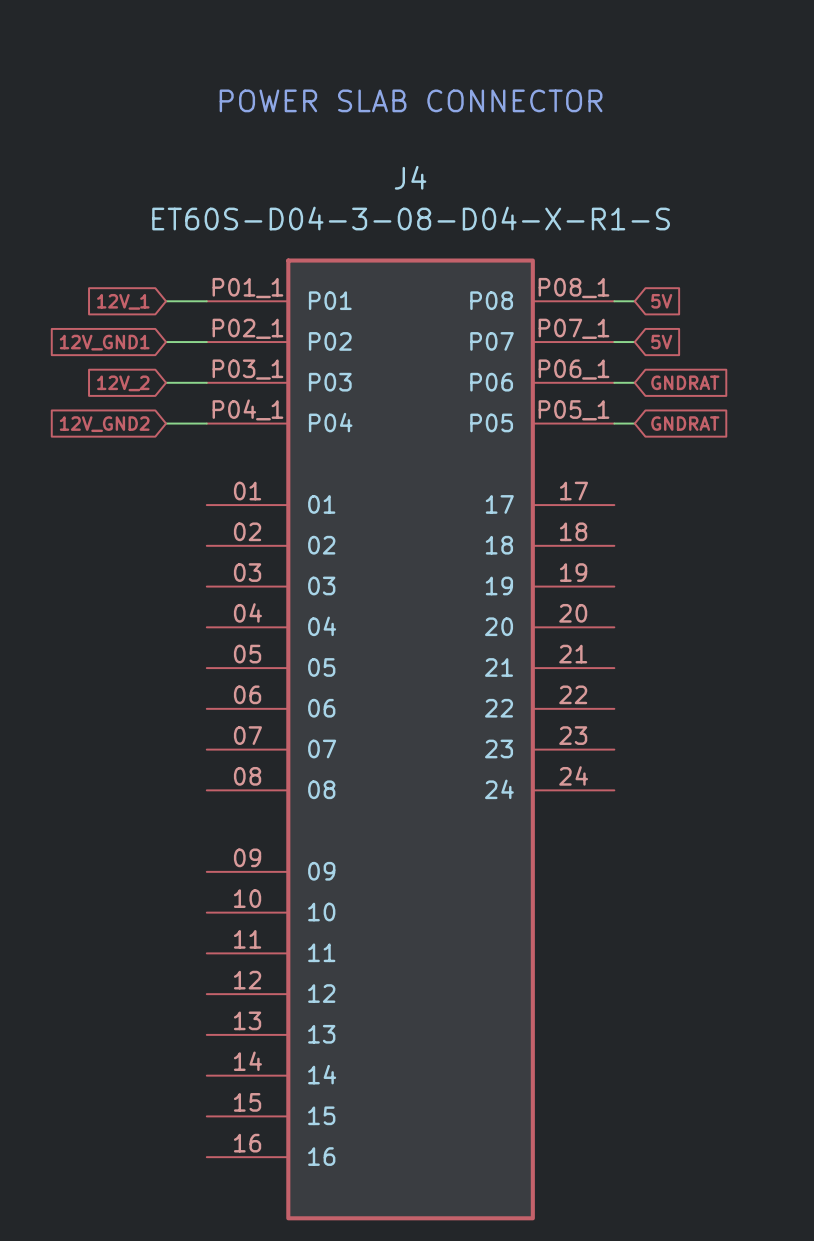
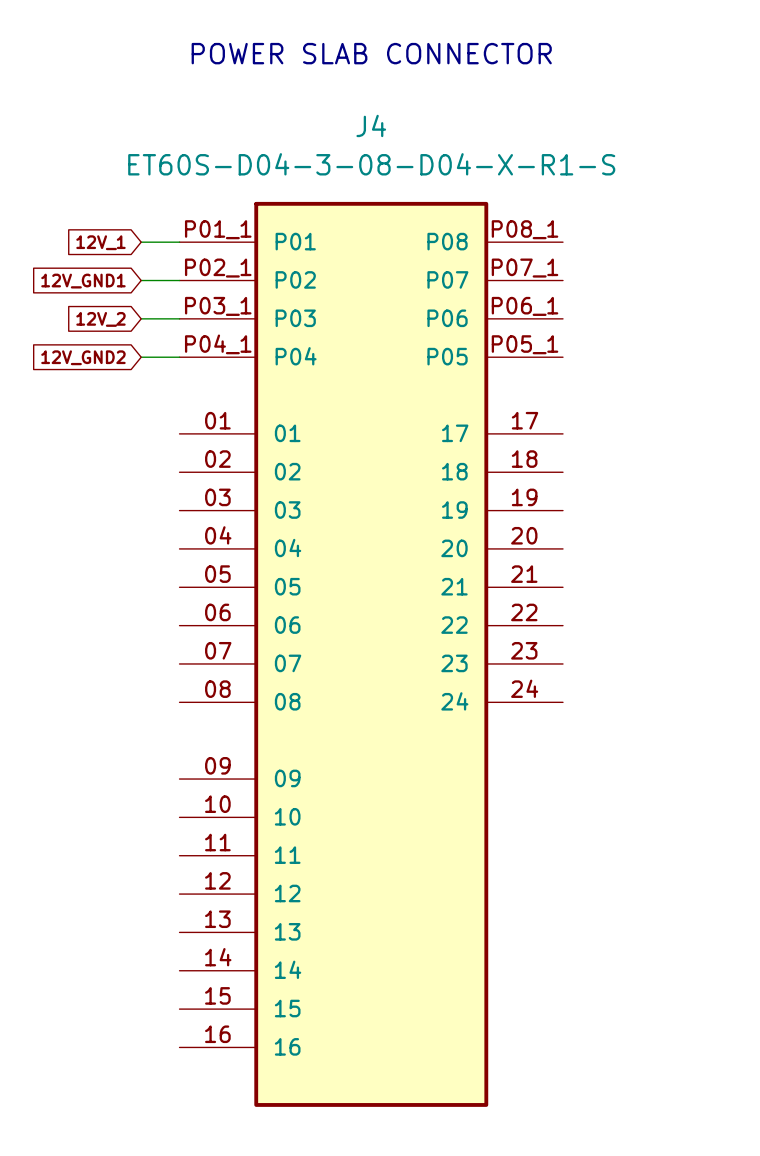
wire: (614, 301) (634, 301) -> none
global label: 5V (661, 301) -> none
wire: (614, 342) (634, 342) -> none
global label: 5V (661, 342) -> none
wire: (614, 382) (634, 382) -> none
global label: GNDRAT (685, 382) -> none
wire: (614, 423) (634, 423) -> none
global label: GNDRAT (685, 423) -> none

